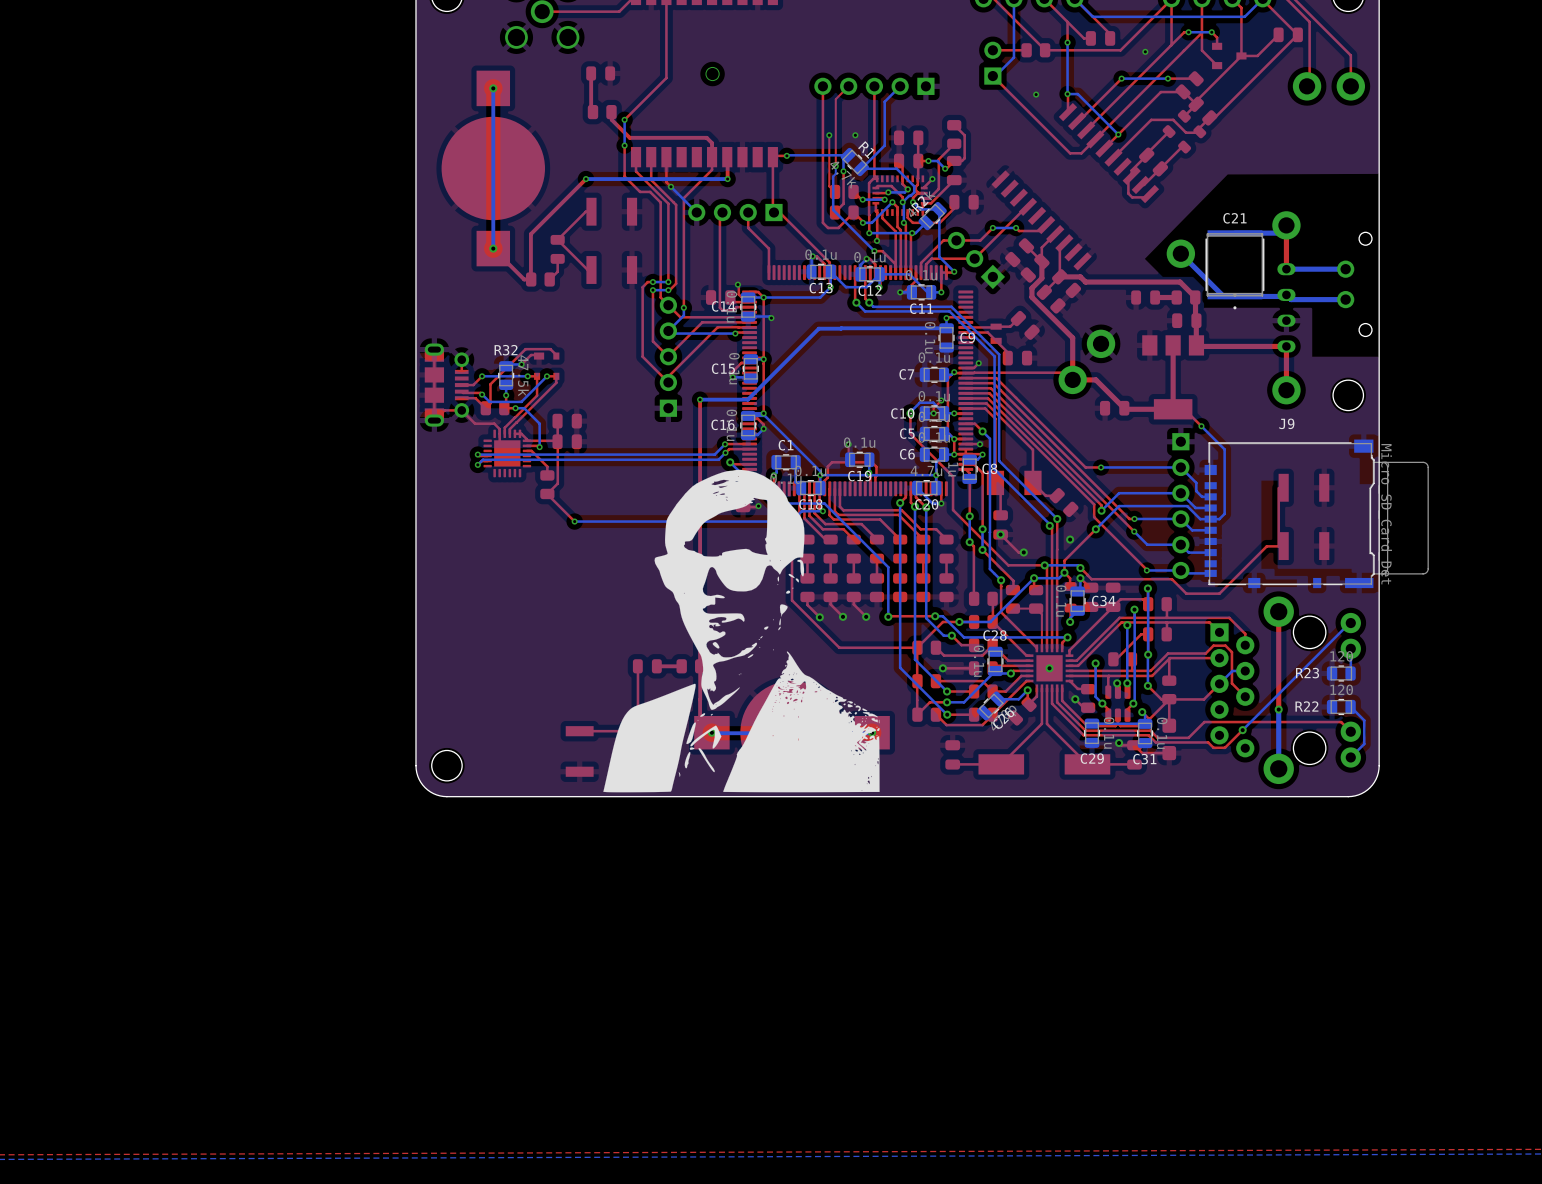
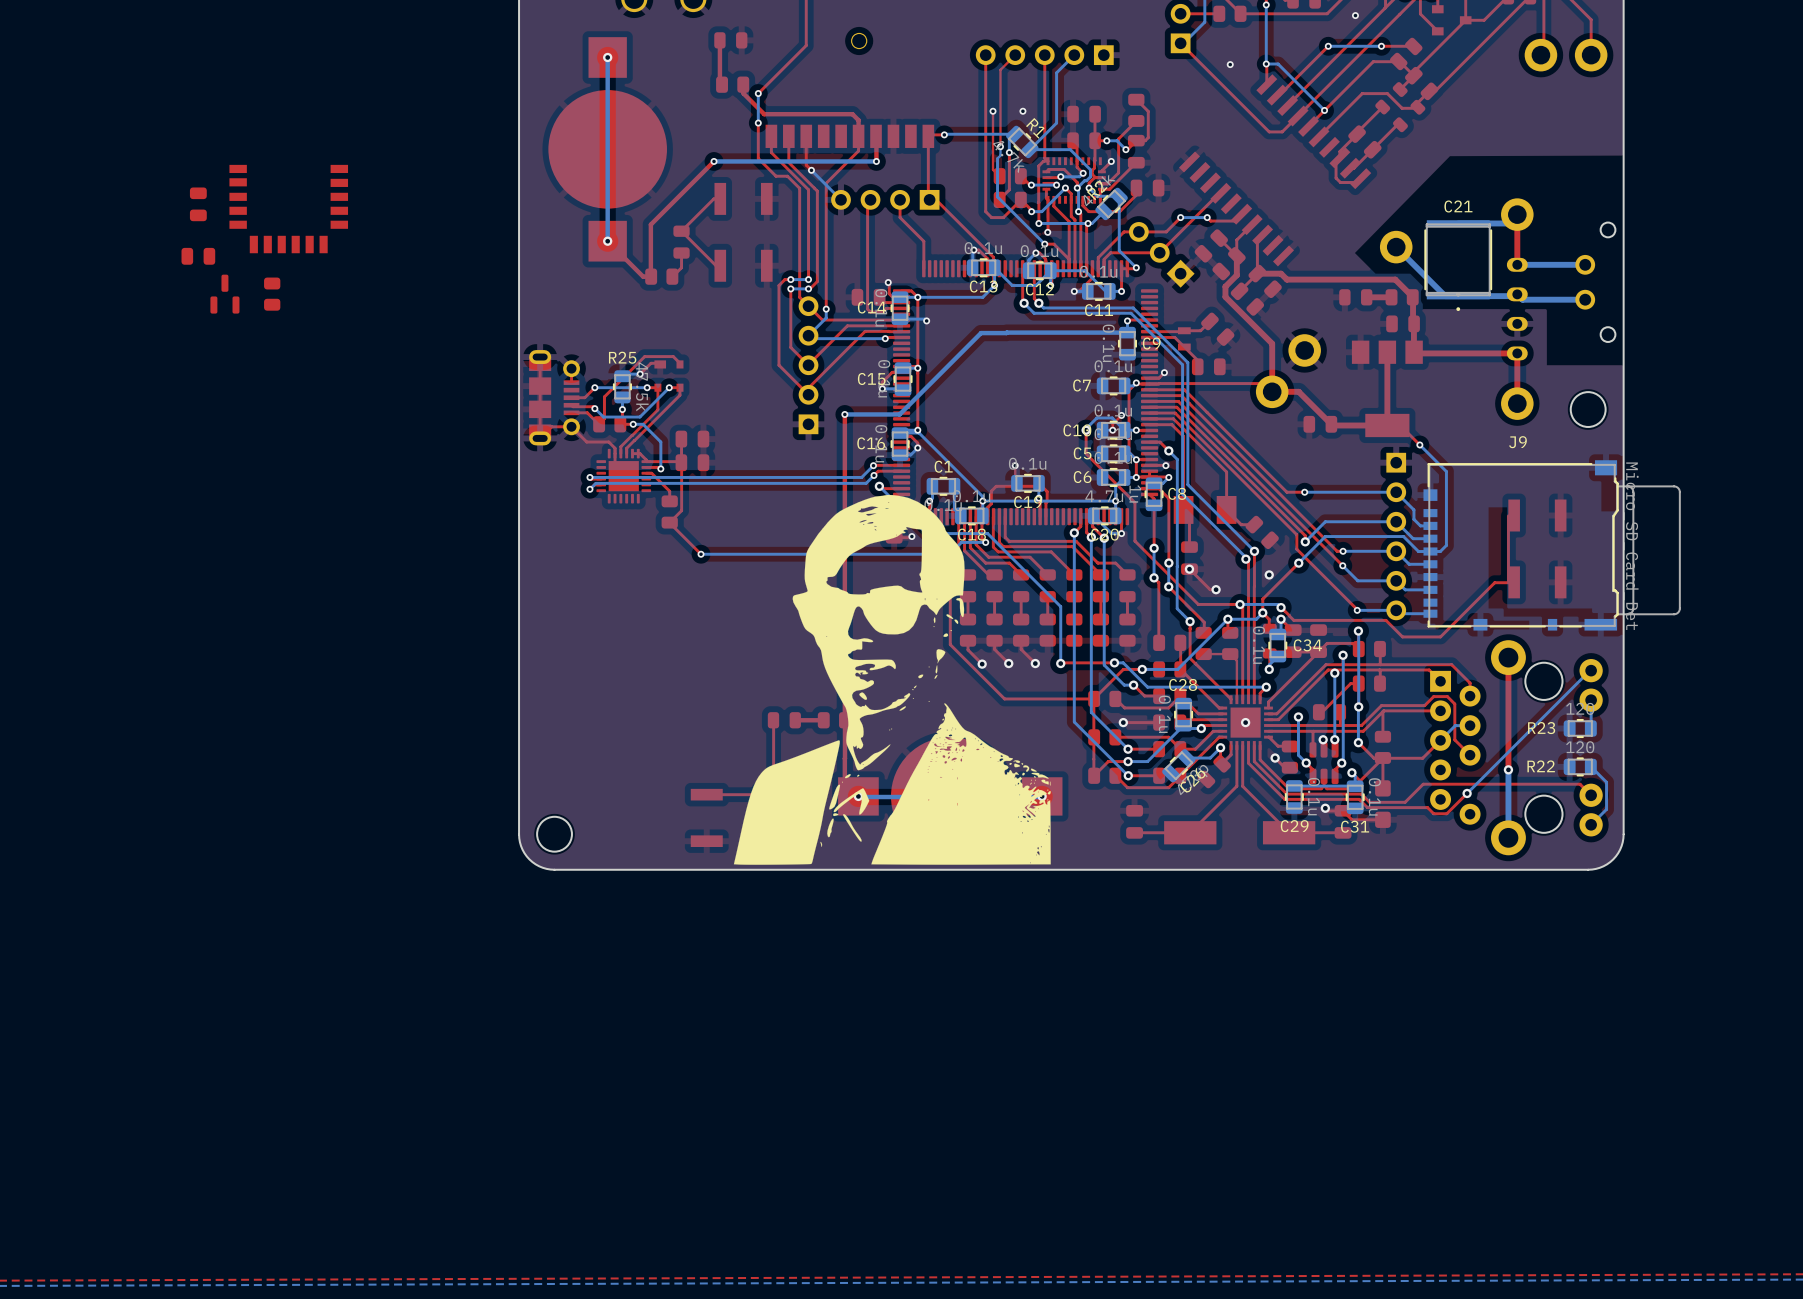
part: none -> (198, 204)
part: none -> (288, 209)
part: none -> (198, 256)
part: none -> (224, 294)
part: none -> (272, 294)
R32 name: R32 (506, 350) -> R25 (622, 357)

